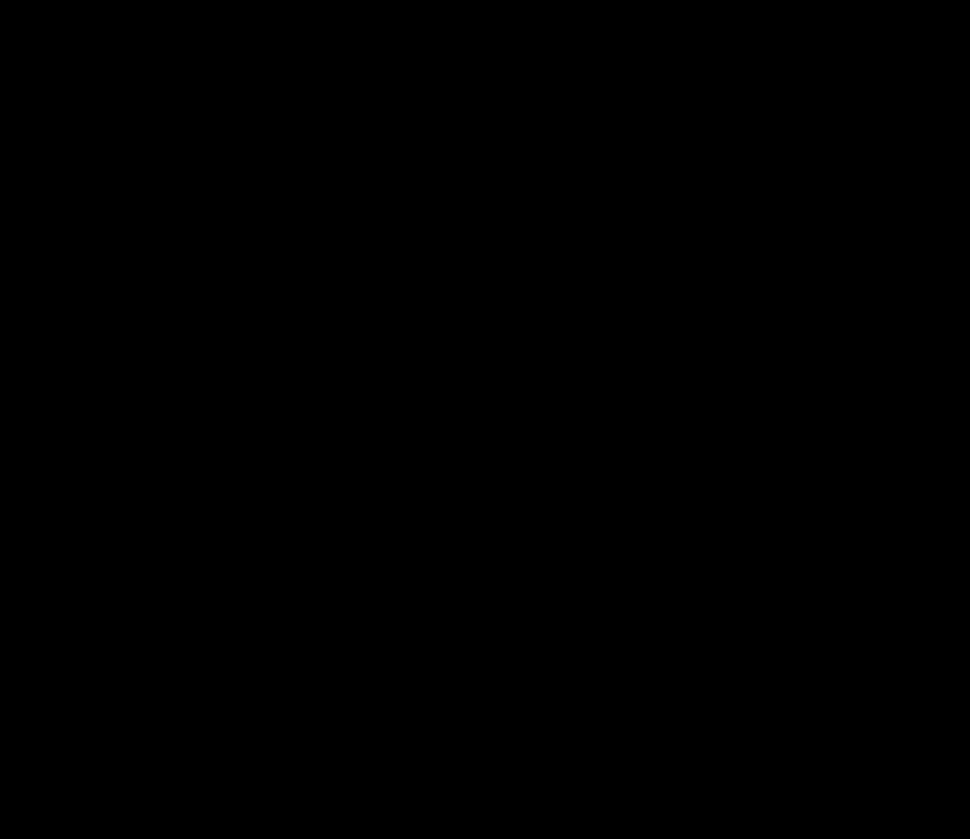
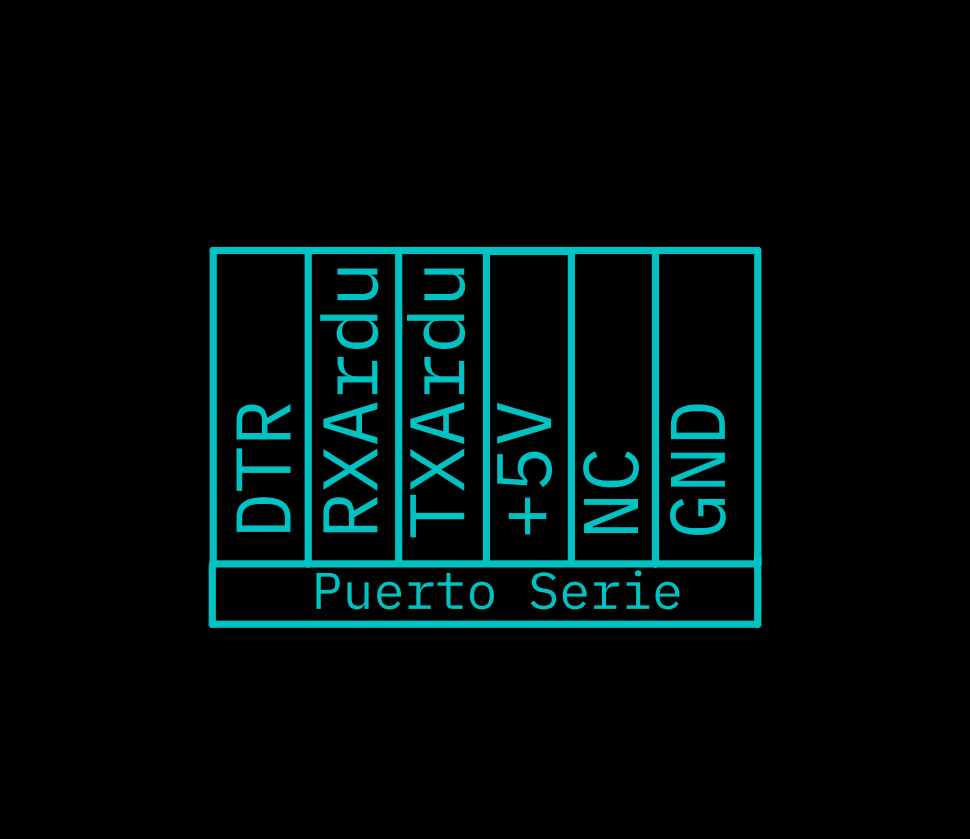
line: none -> (308, 250) (308, 563)
line: none -> (655, 250) (655, 563)
line: none -> (398, 253) (398, 561)
text: none -> RXArdu (349, 400)
text: none -> TXArdu (436, 402)
text: none -> DTR (263, 467)
text: none -> +5V (524, 468)
text: none -> GND (697, 469)
text: none -> NC (611, 492)
line: none -> (571, 561) (571, 251) (486, 251) (486, 562)
line: none -> (215, 563) (757, 563)
line: none -> (212, 564) (212, 624) (757, 624) (757, 250) (213, 250) (213, 564)
text: none -> Puerto Serie (497, 589)

